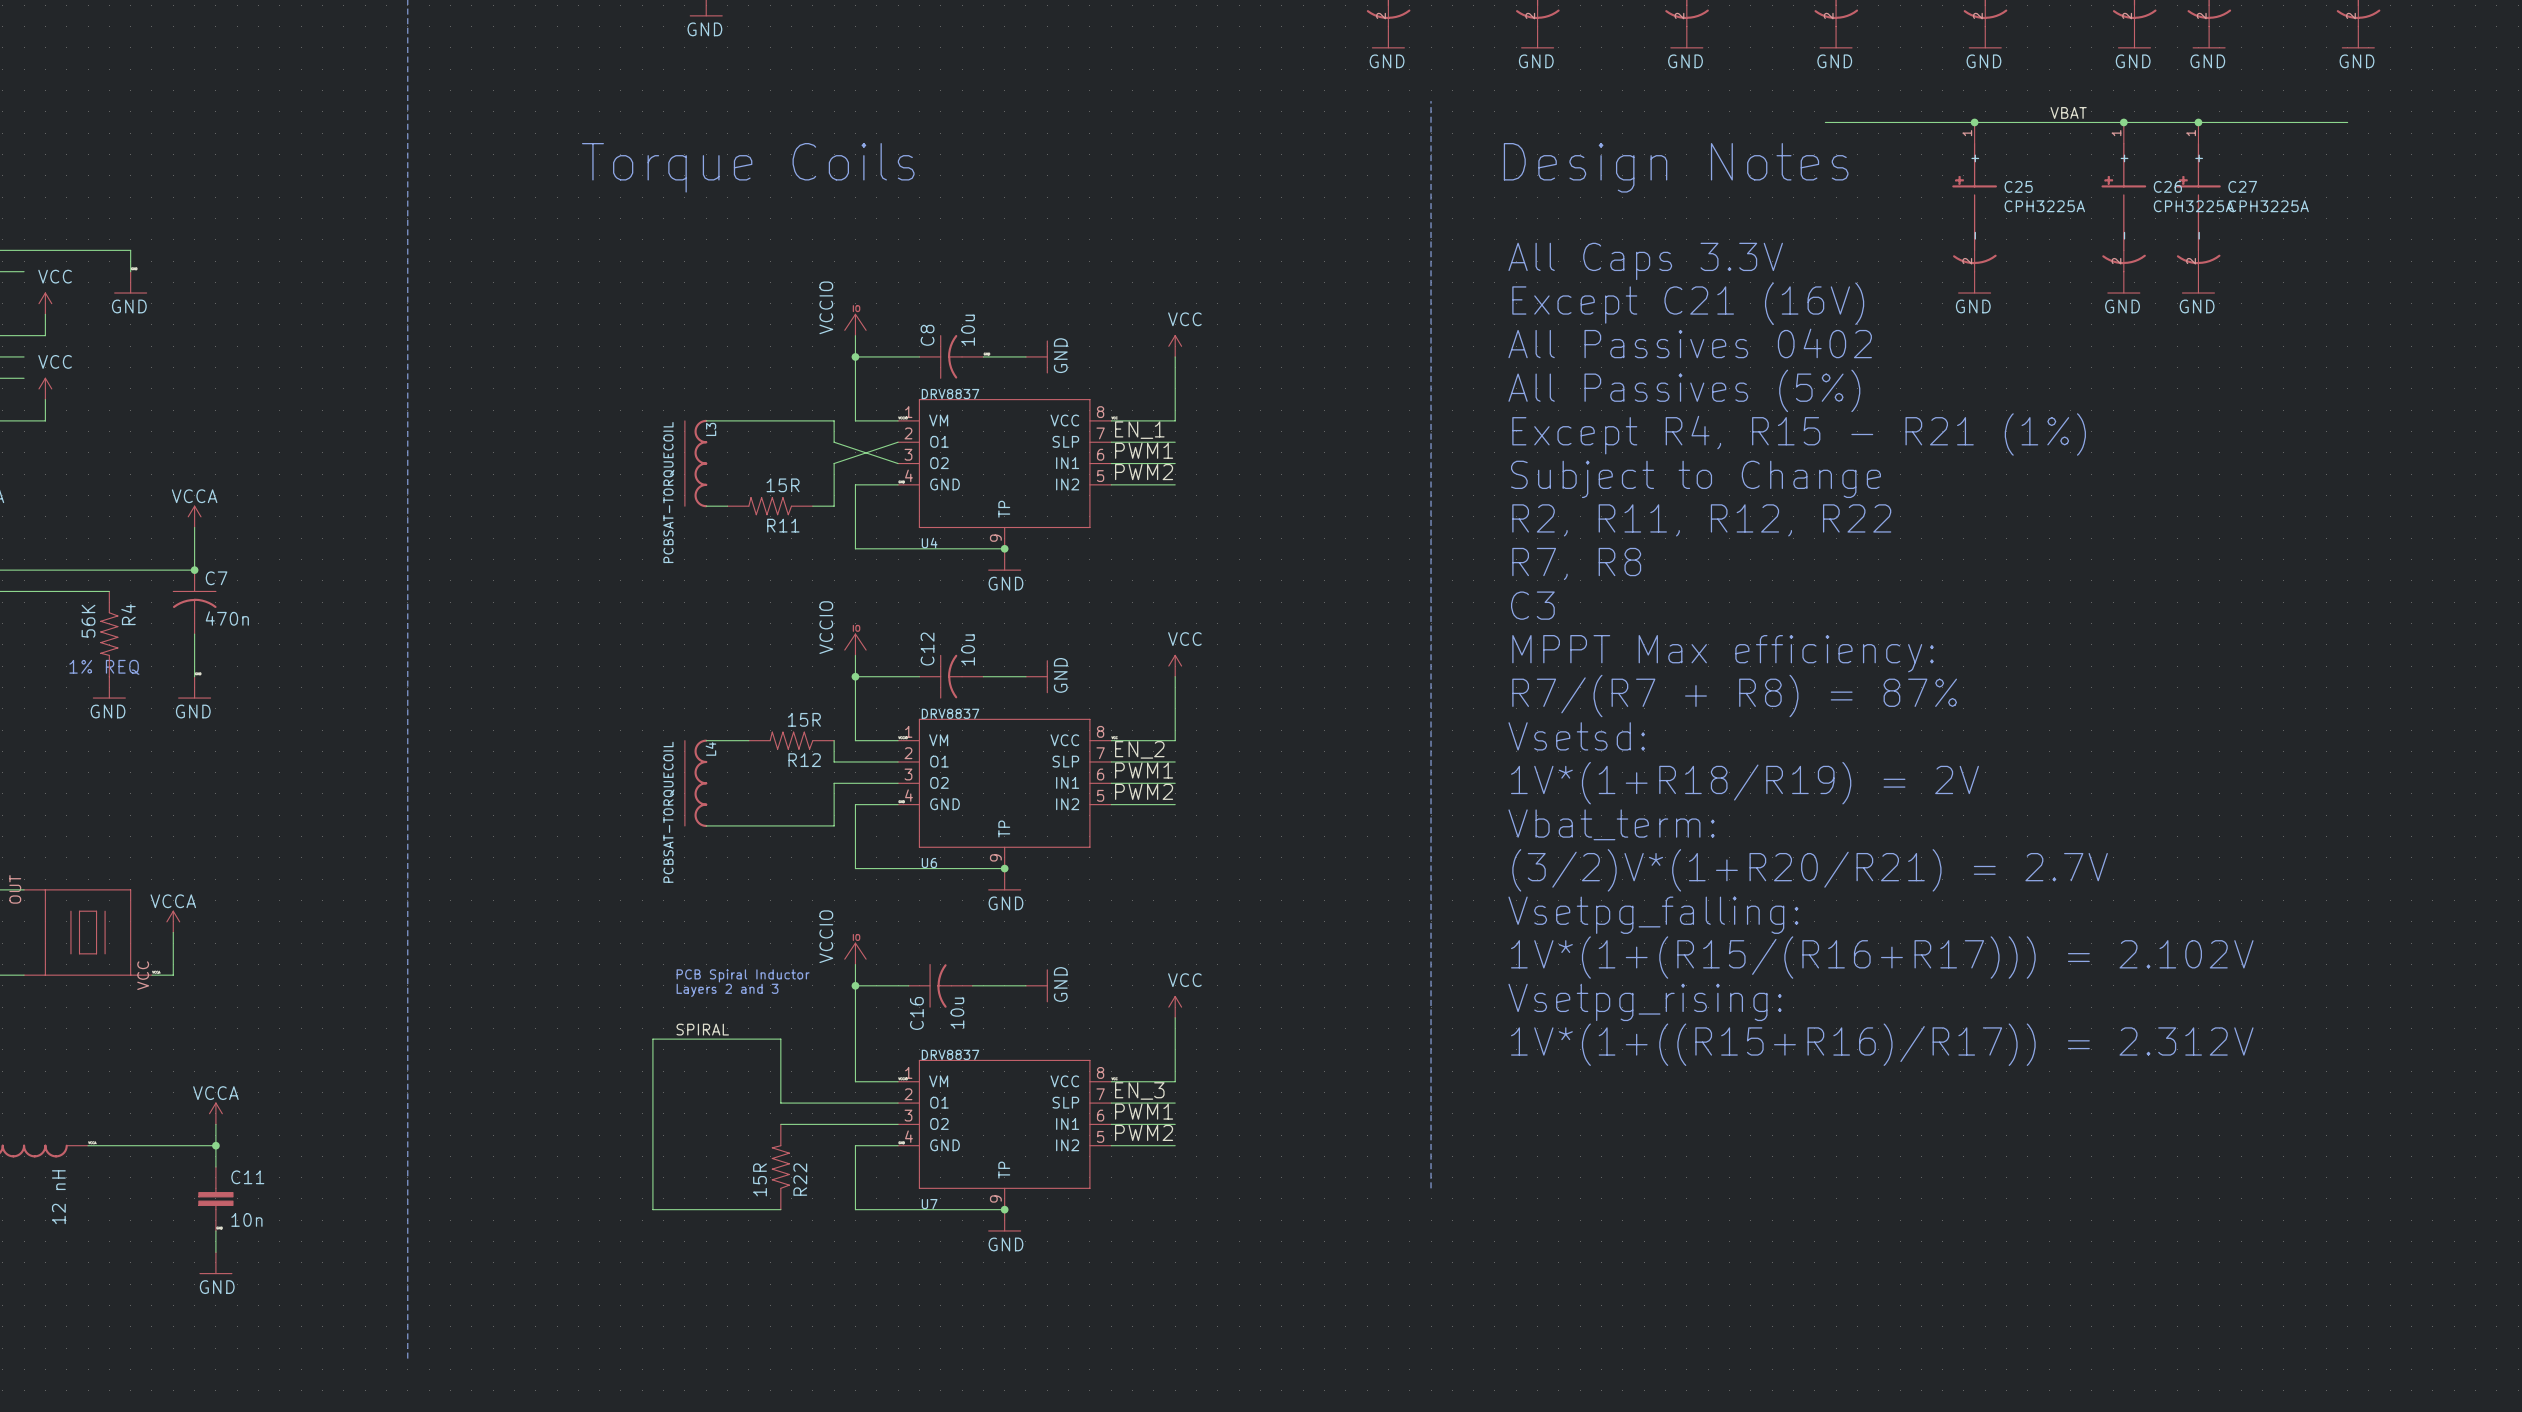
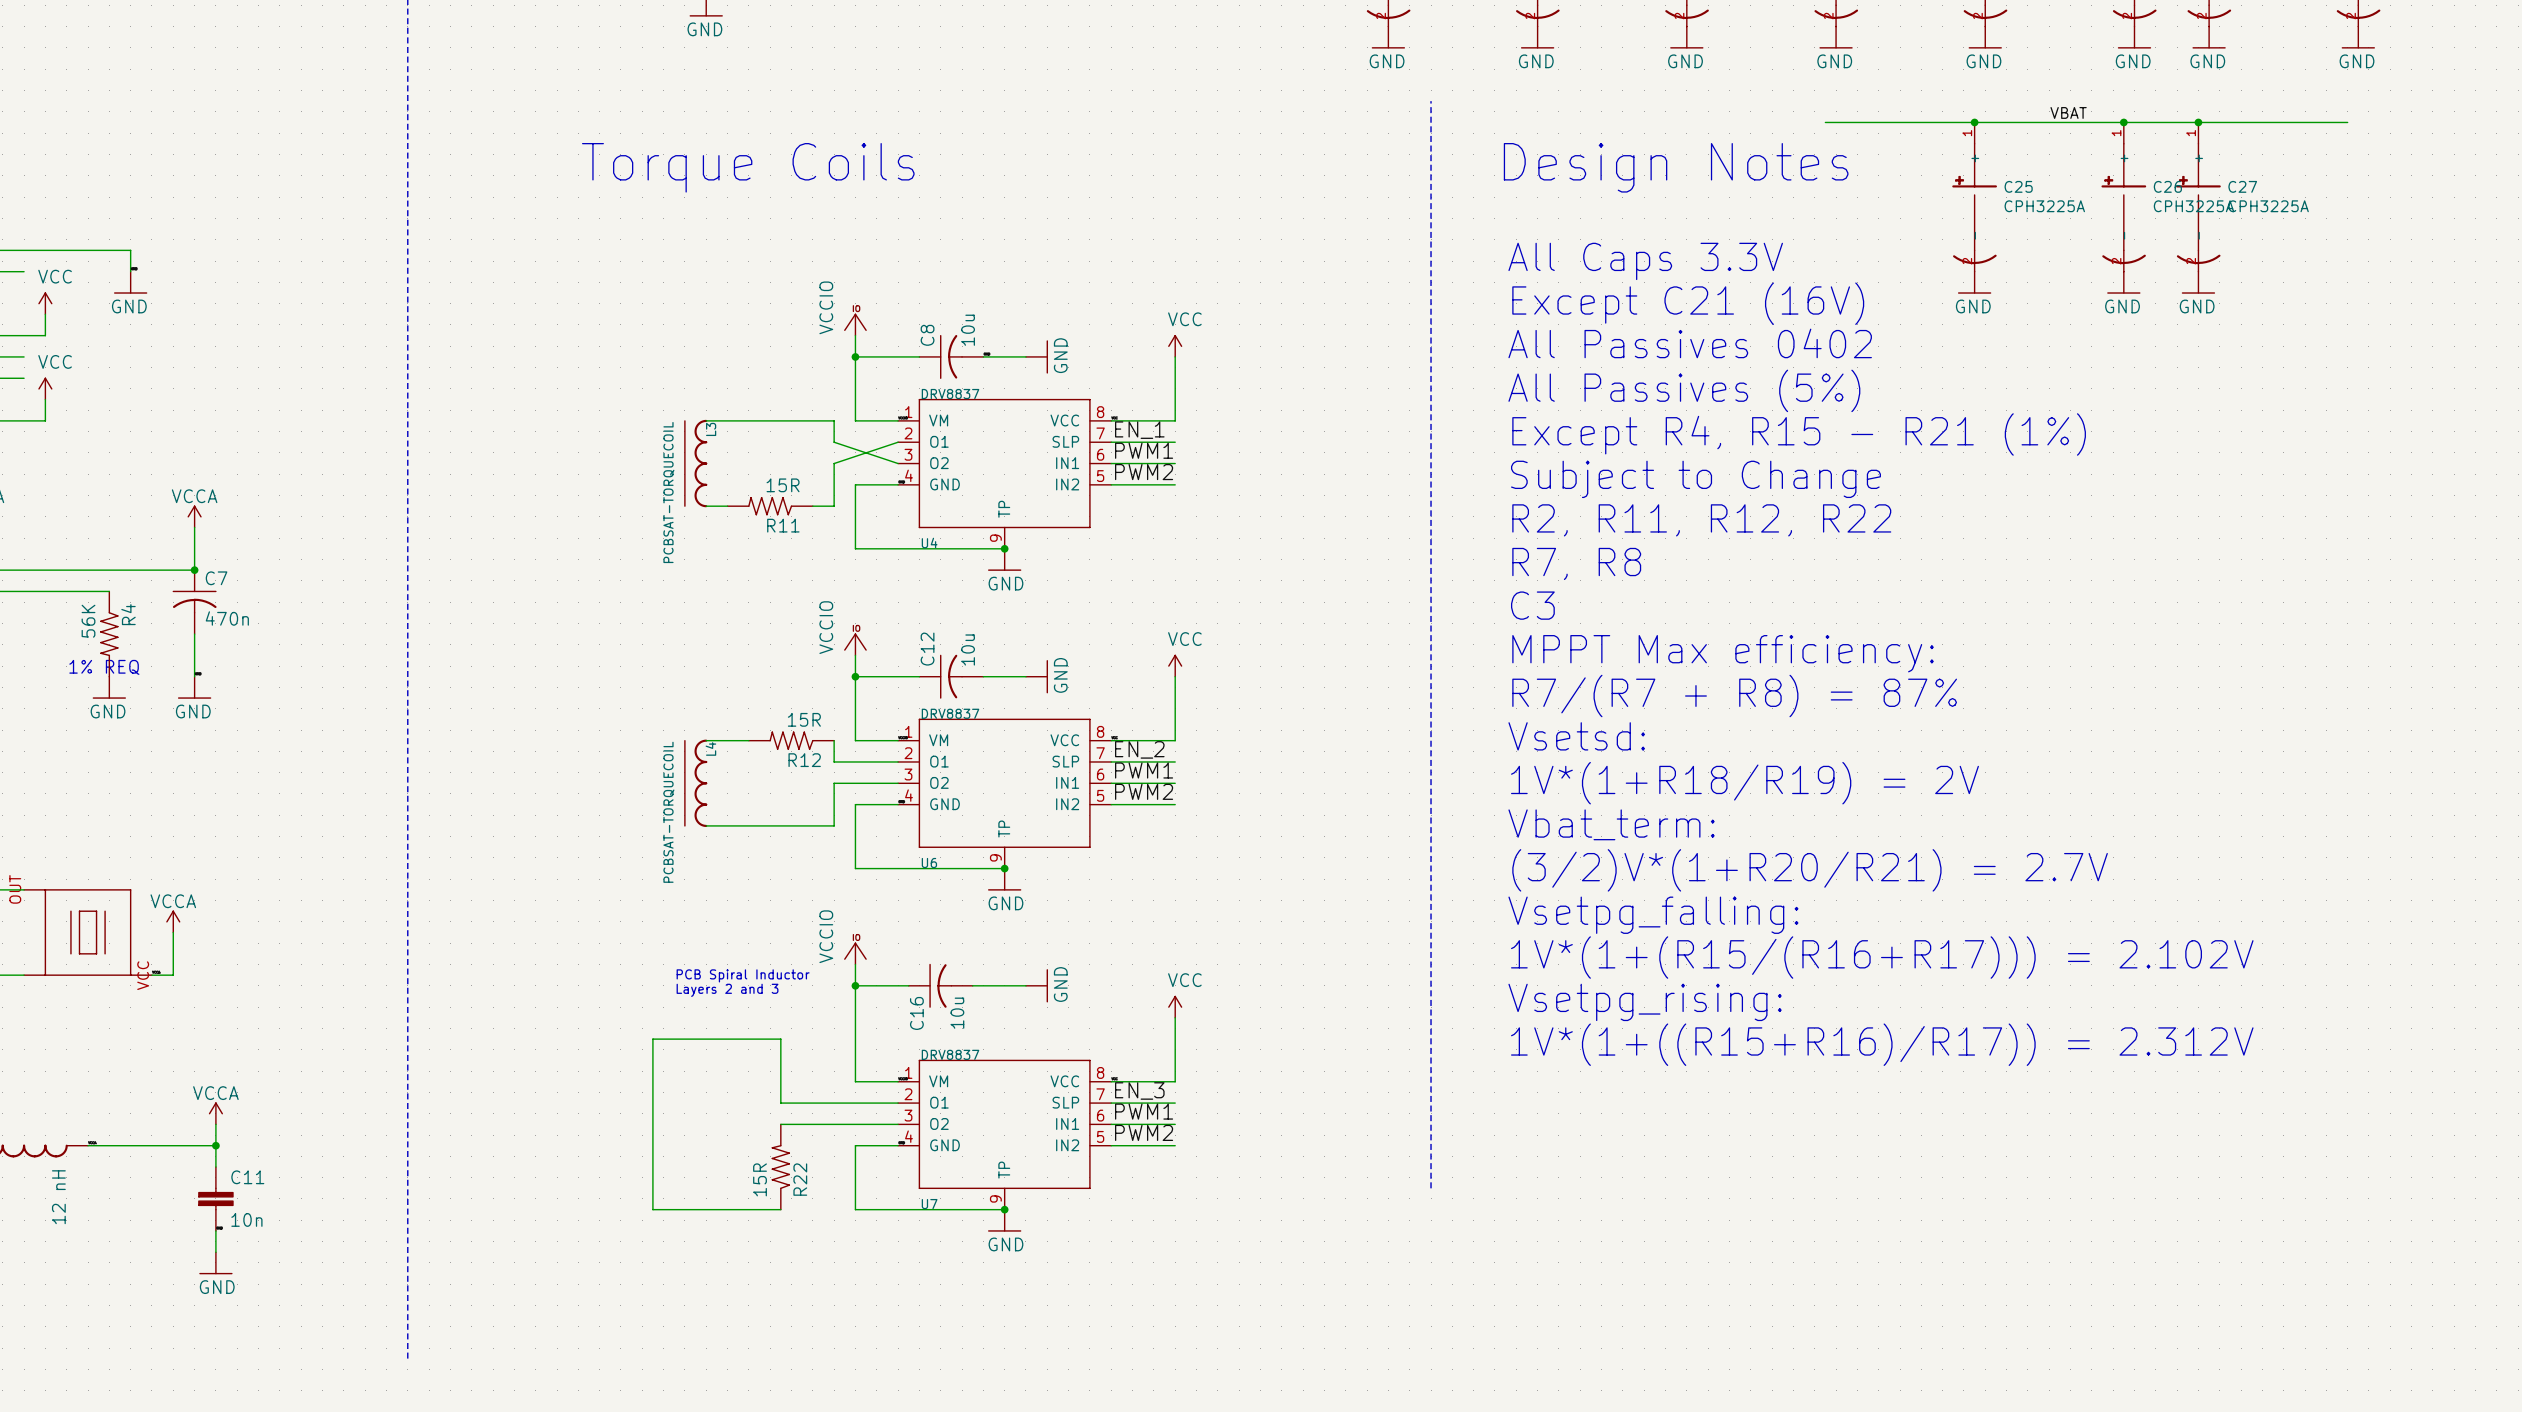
label: SPIRAL (702, 1029) -> none

